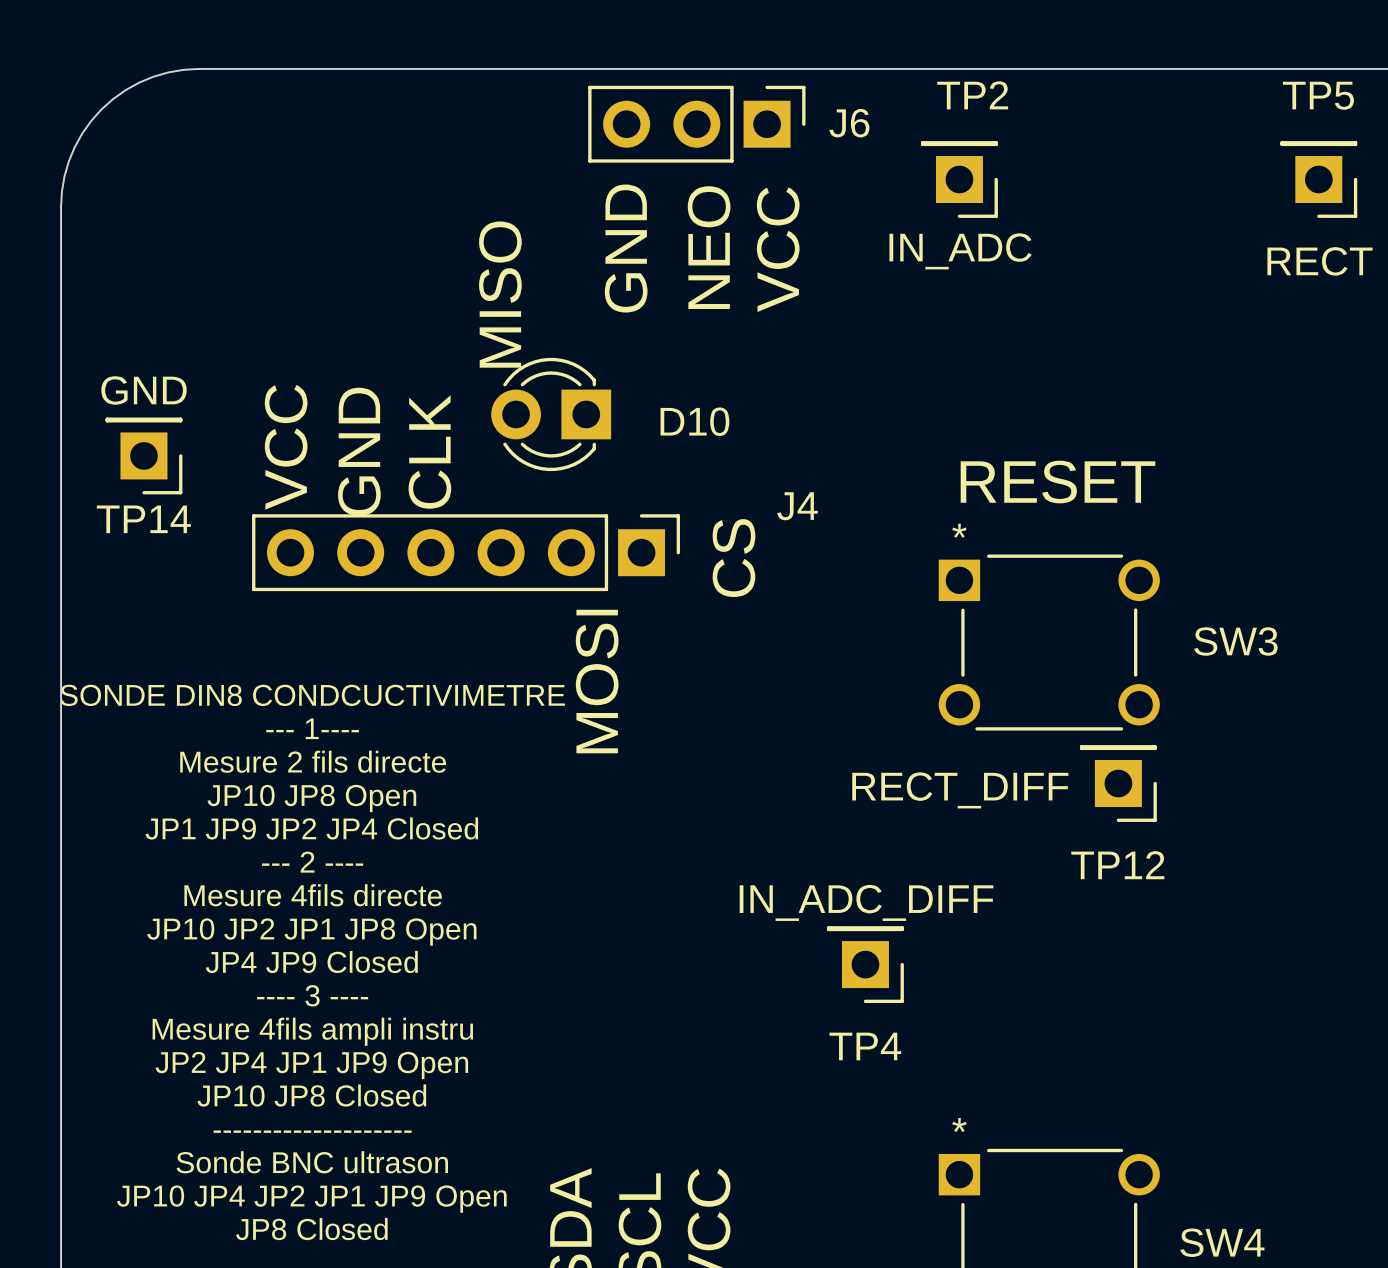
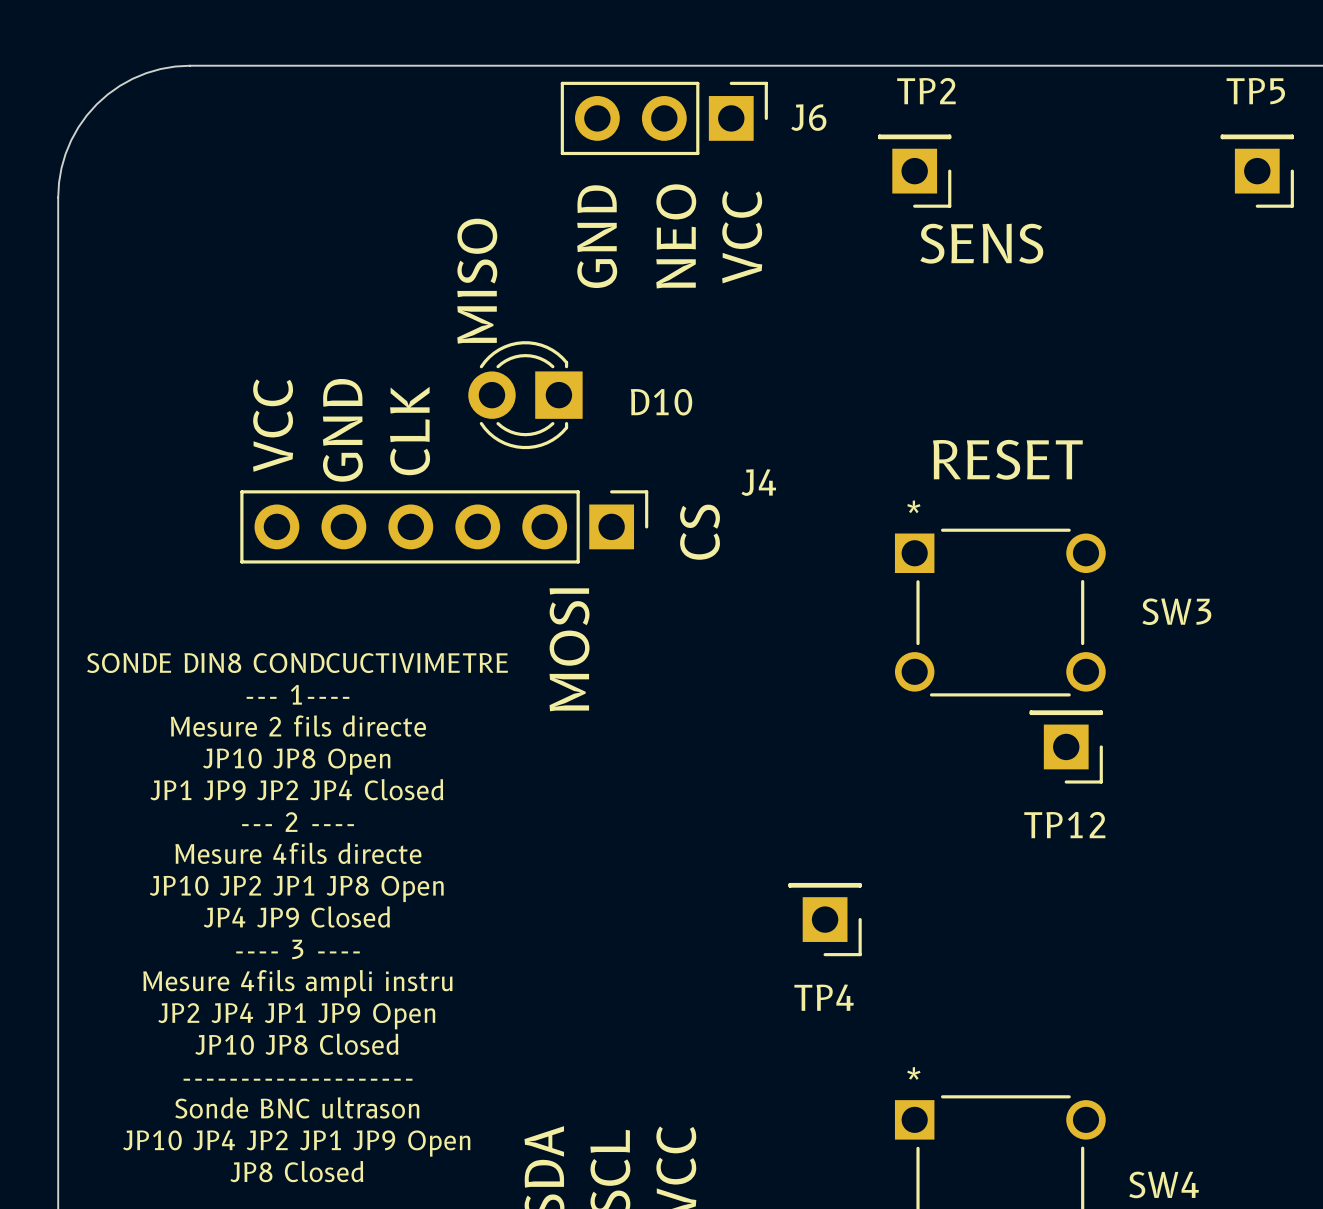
TP2 value: IN_ADC (960, 251) -> none
text: none -> SENS (981, 243)
TP5 value: RECT (1320, 261) -> none
TP14: GND (143, 455) -> none
TP12 value: RECT_DIFF (960, 790) -> none
TP4 value: IN_ADC_DIFF (866, 902) -> none

